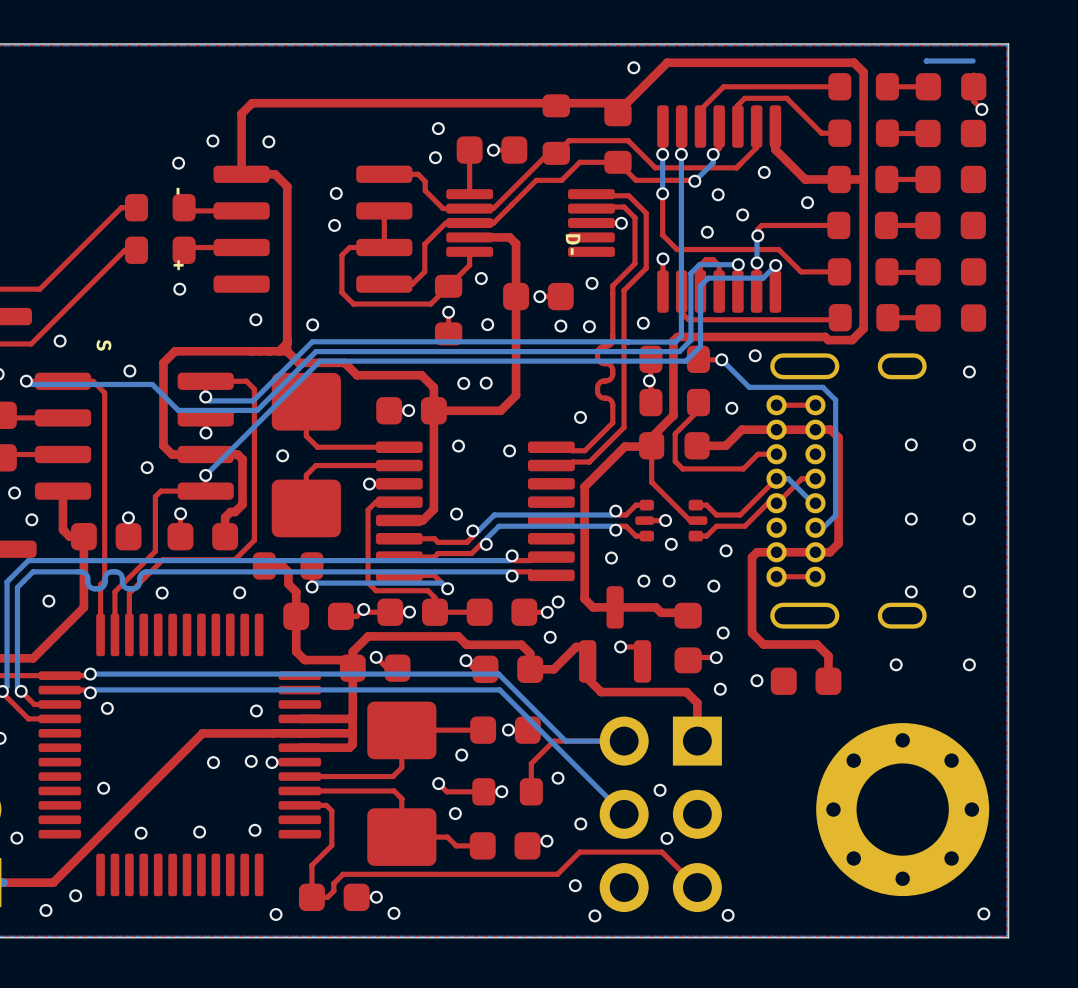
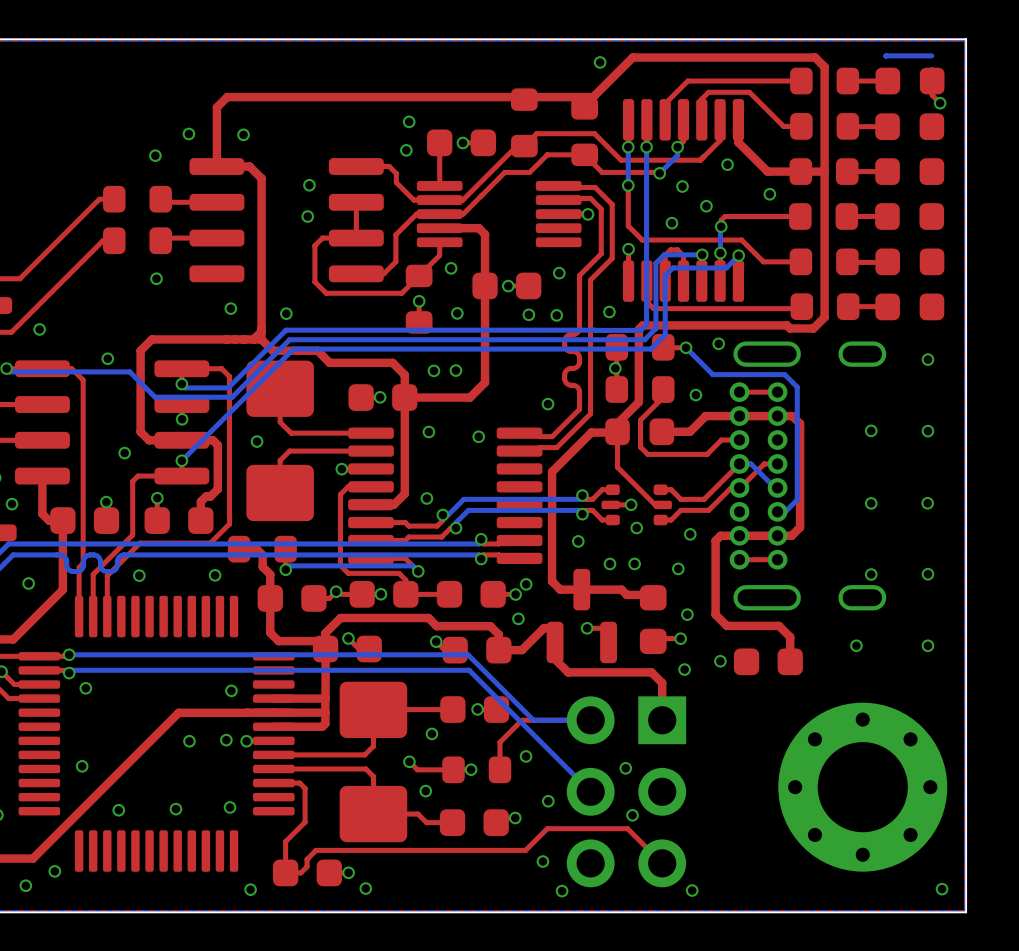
text: - (178, 191) -> none
text: D- (573, 244) -> none
text: + (178, 265) -> none
text: S (103, 345) -> none

